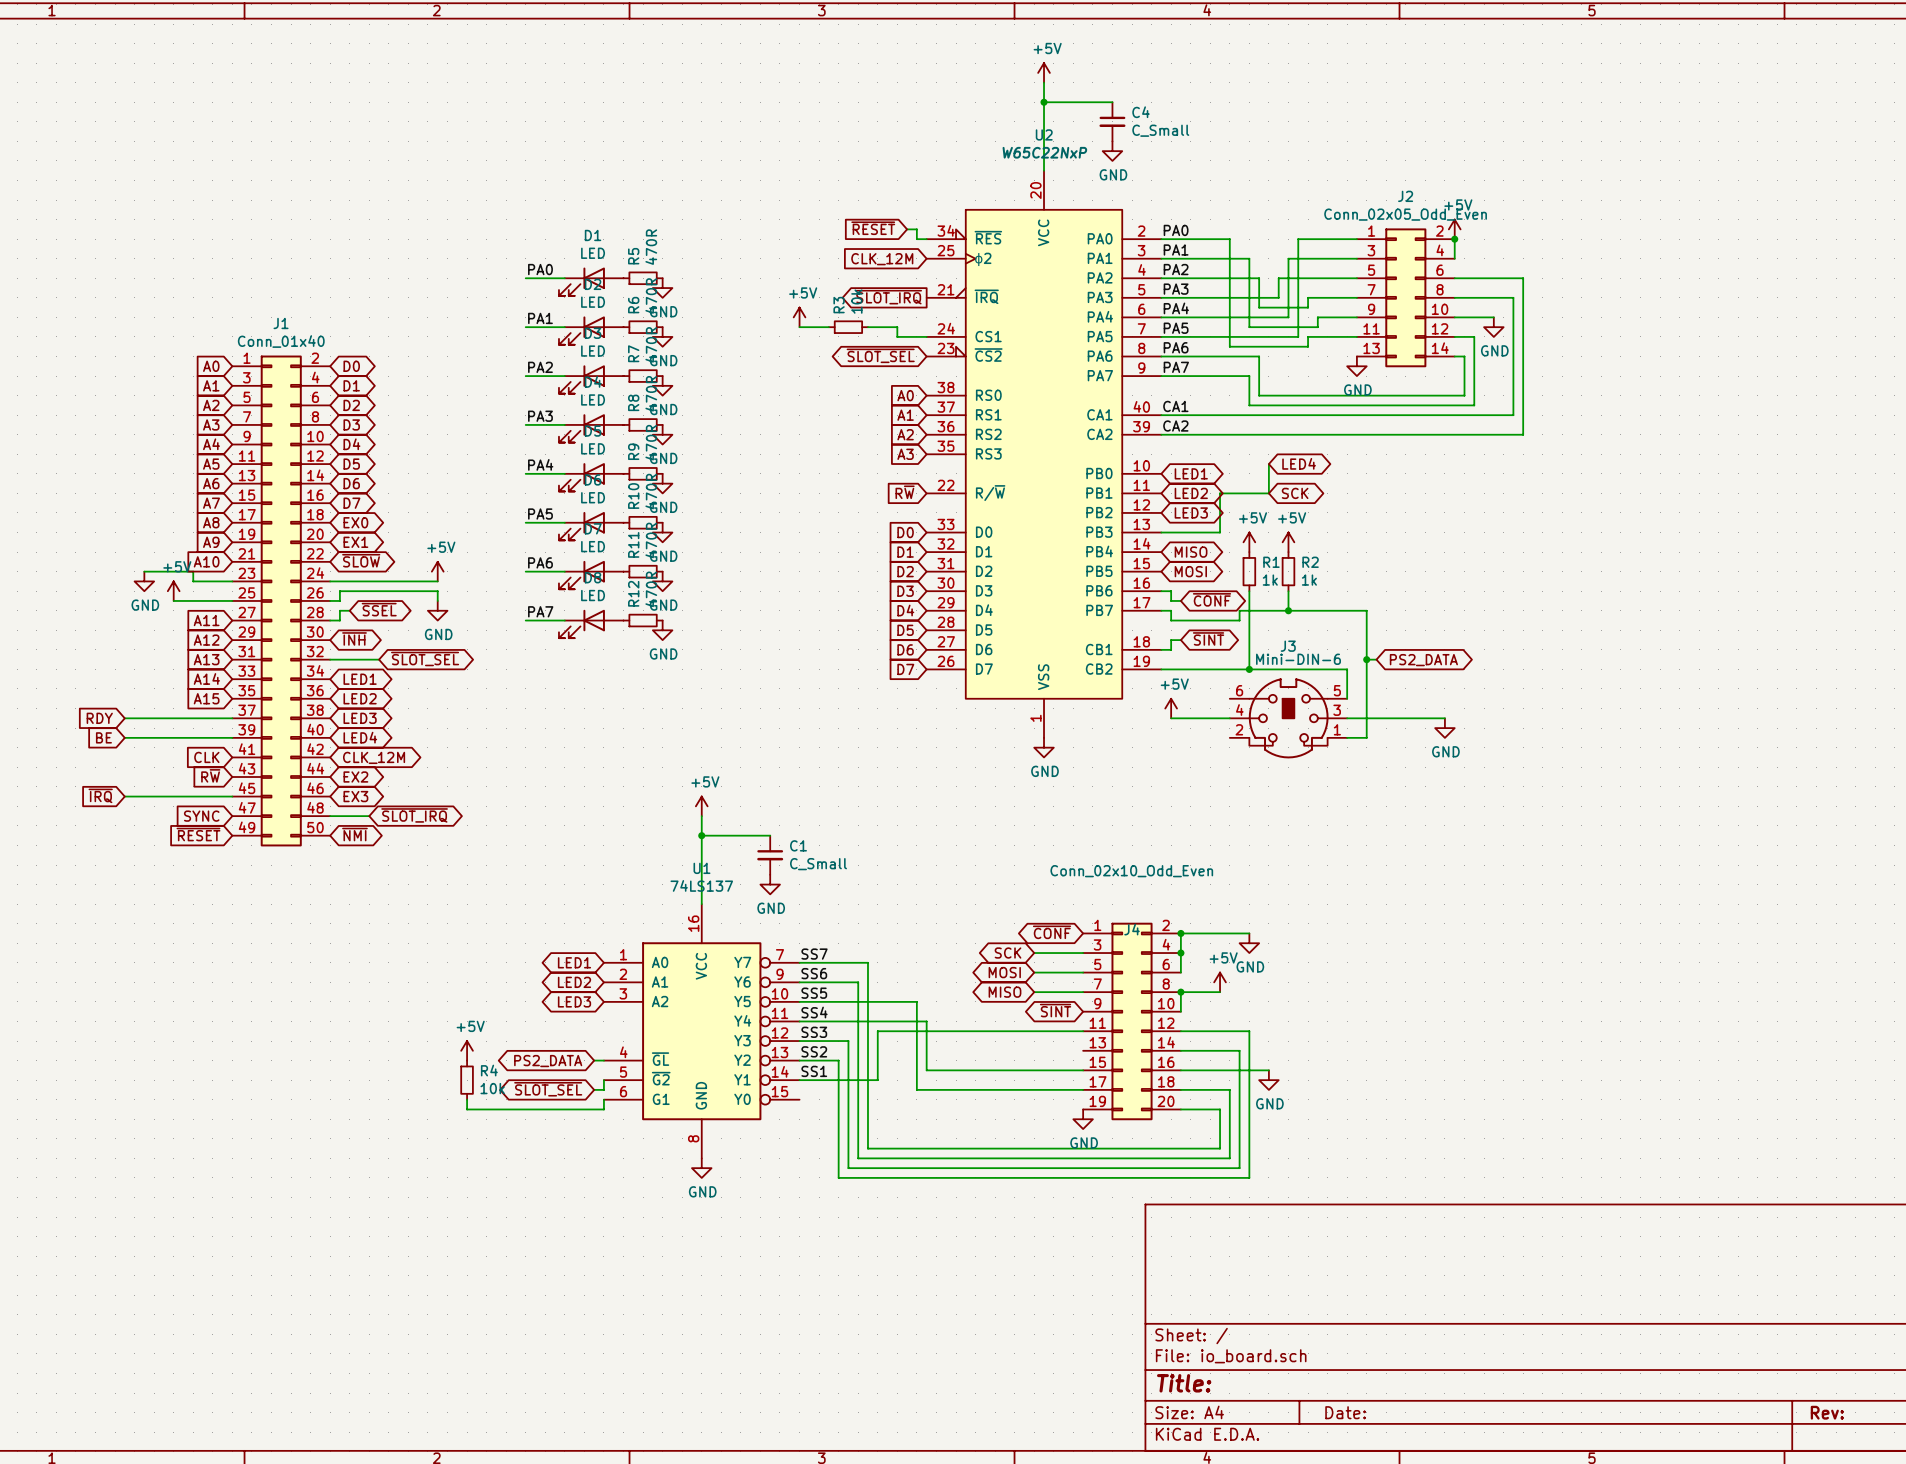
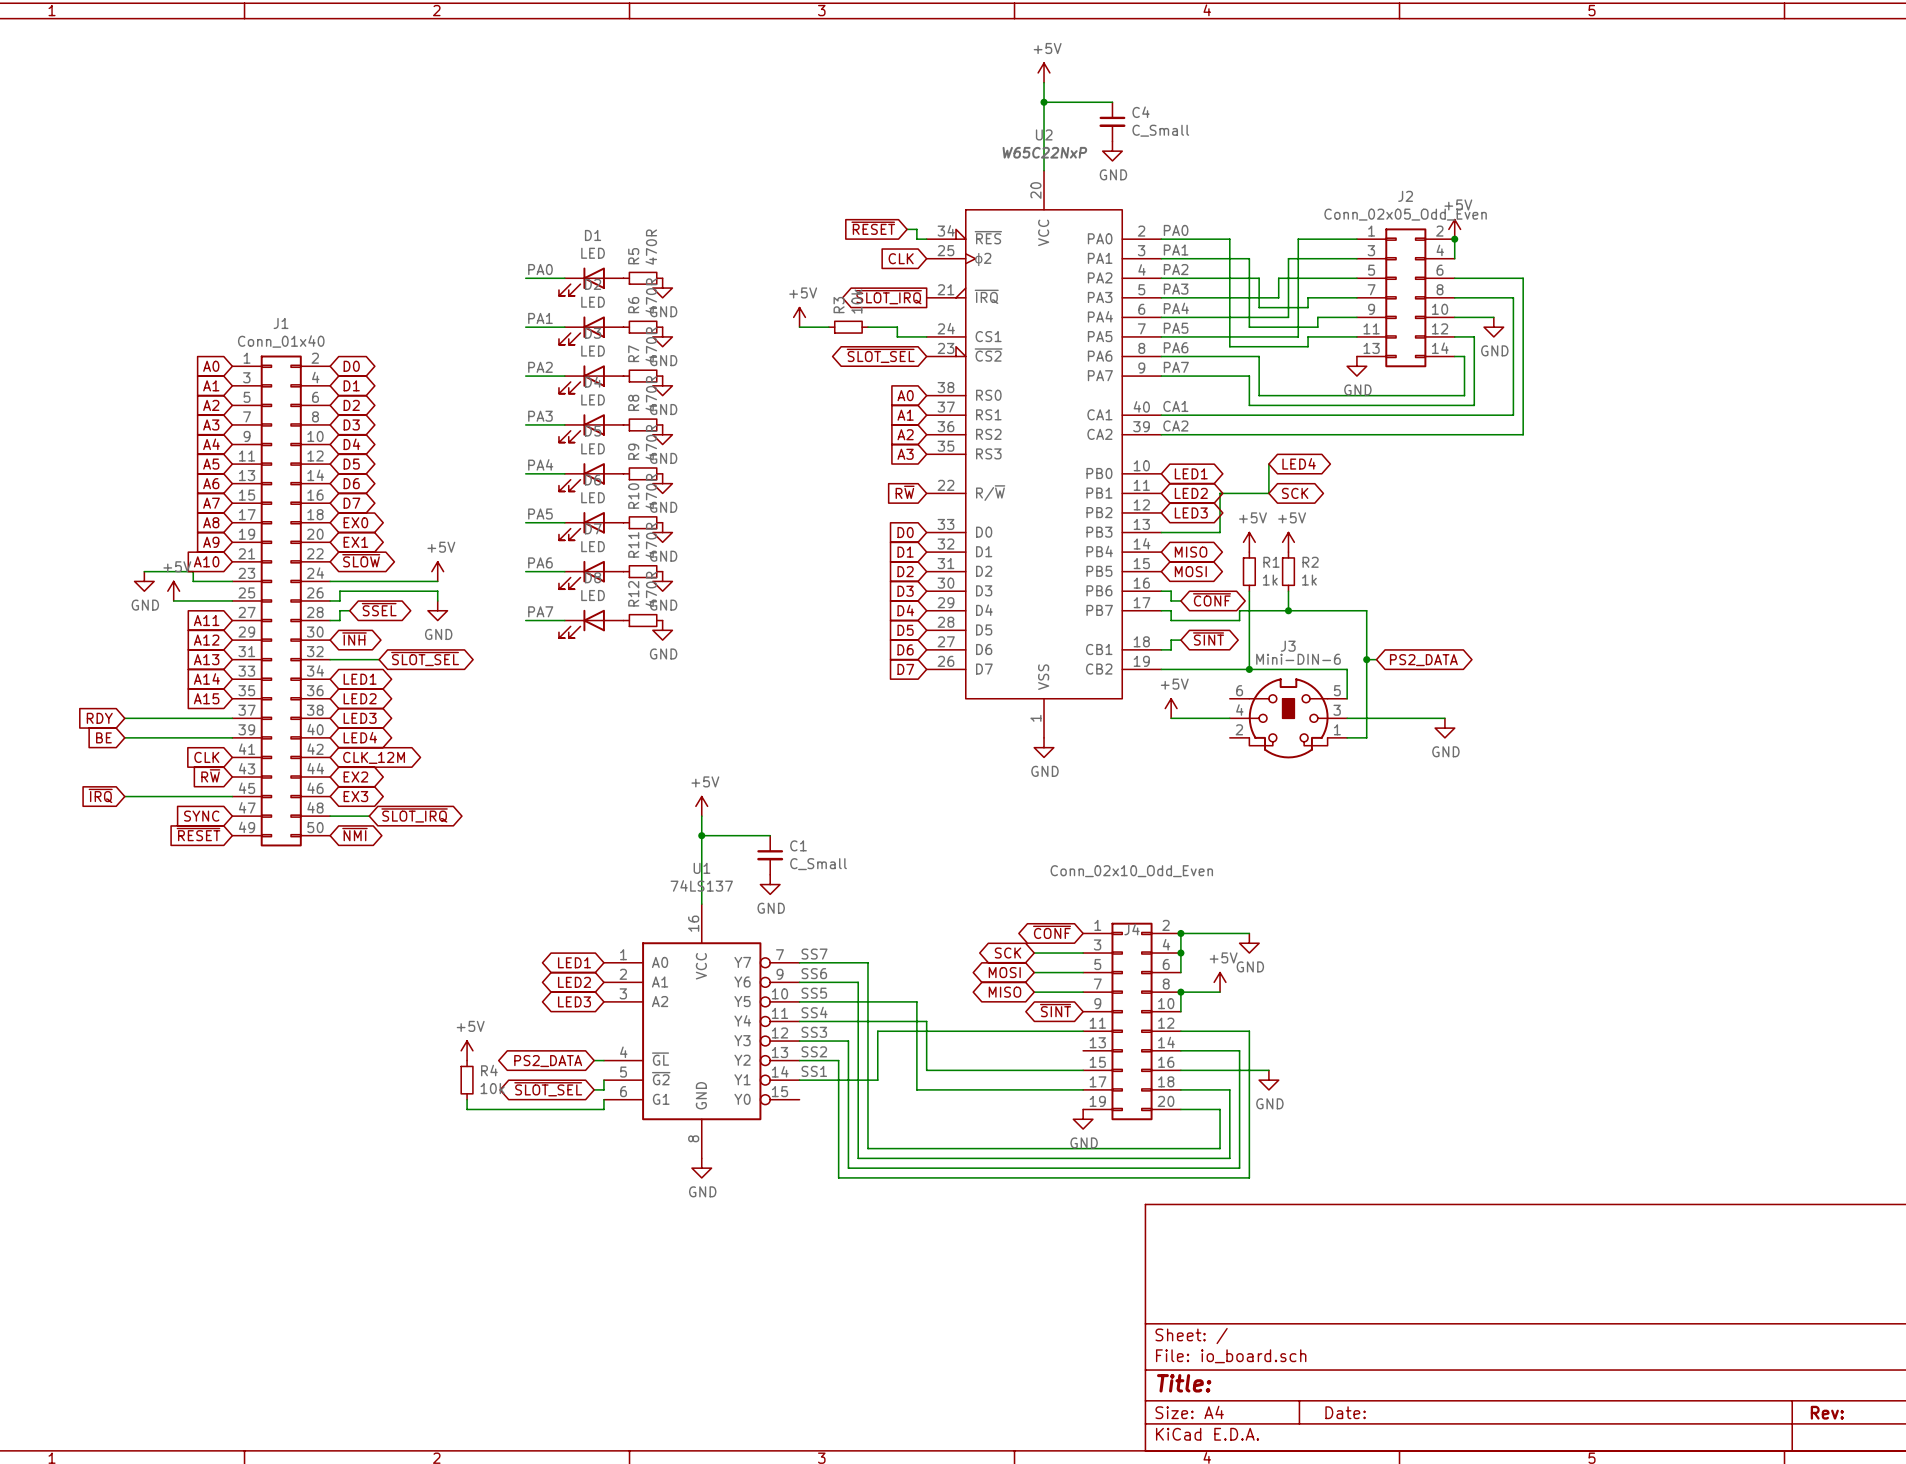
global label: CLK_12M (882, 259) -> CLK (901, 258)

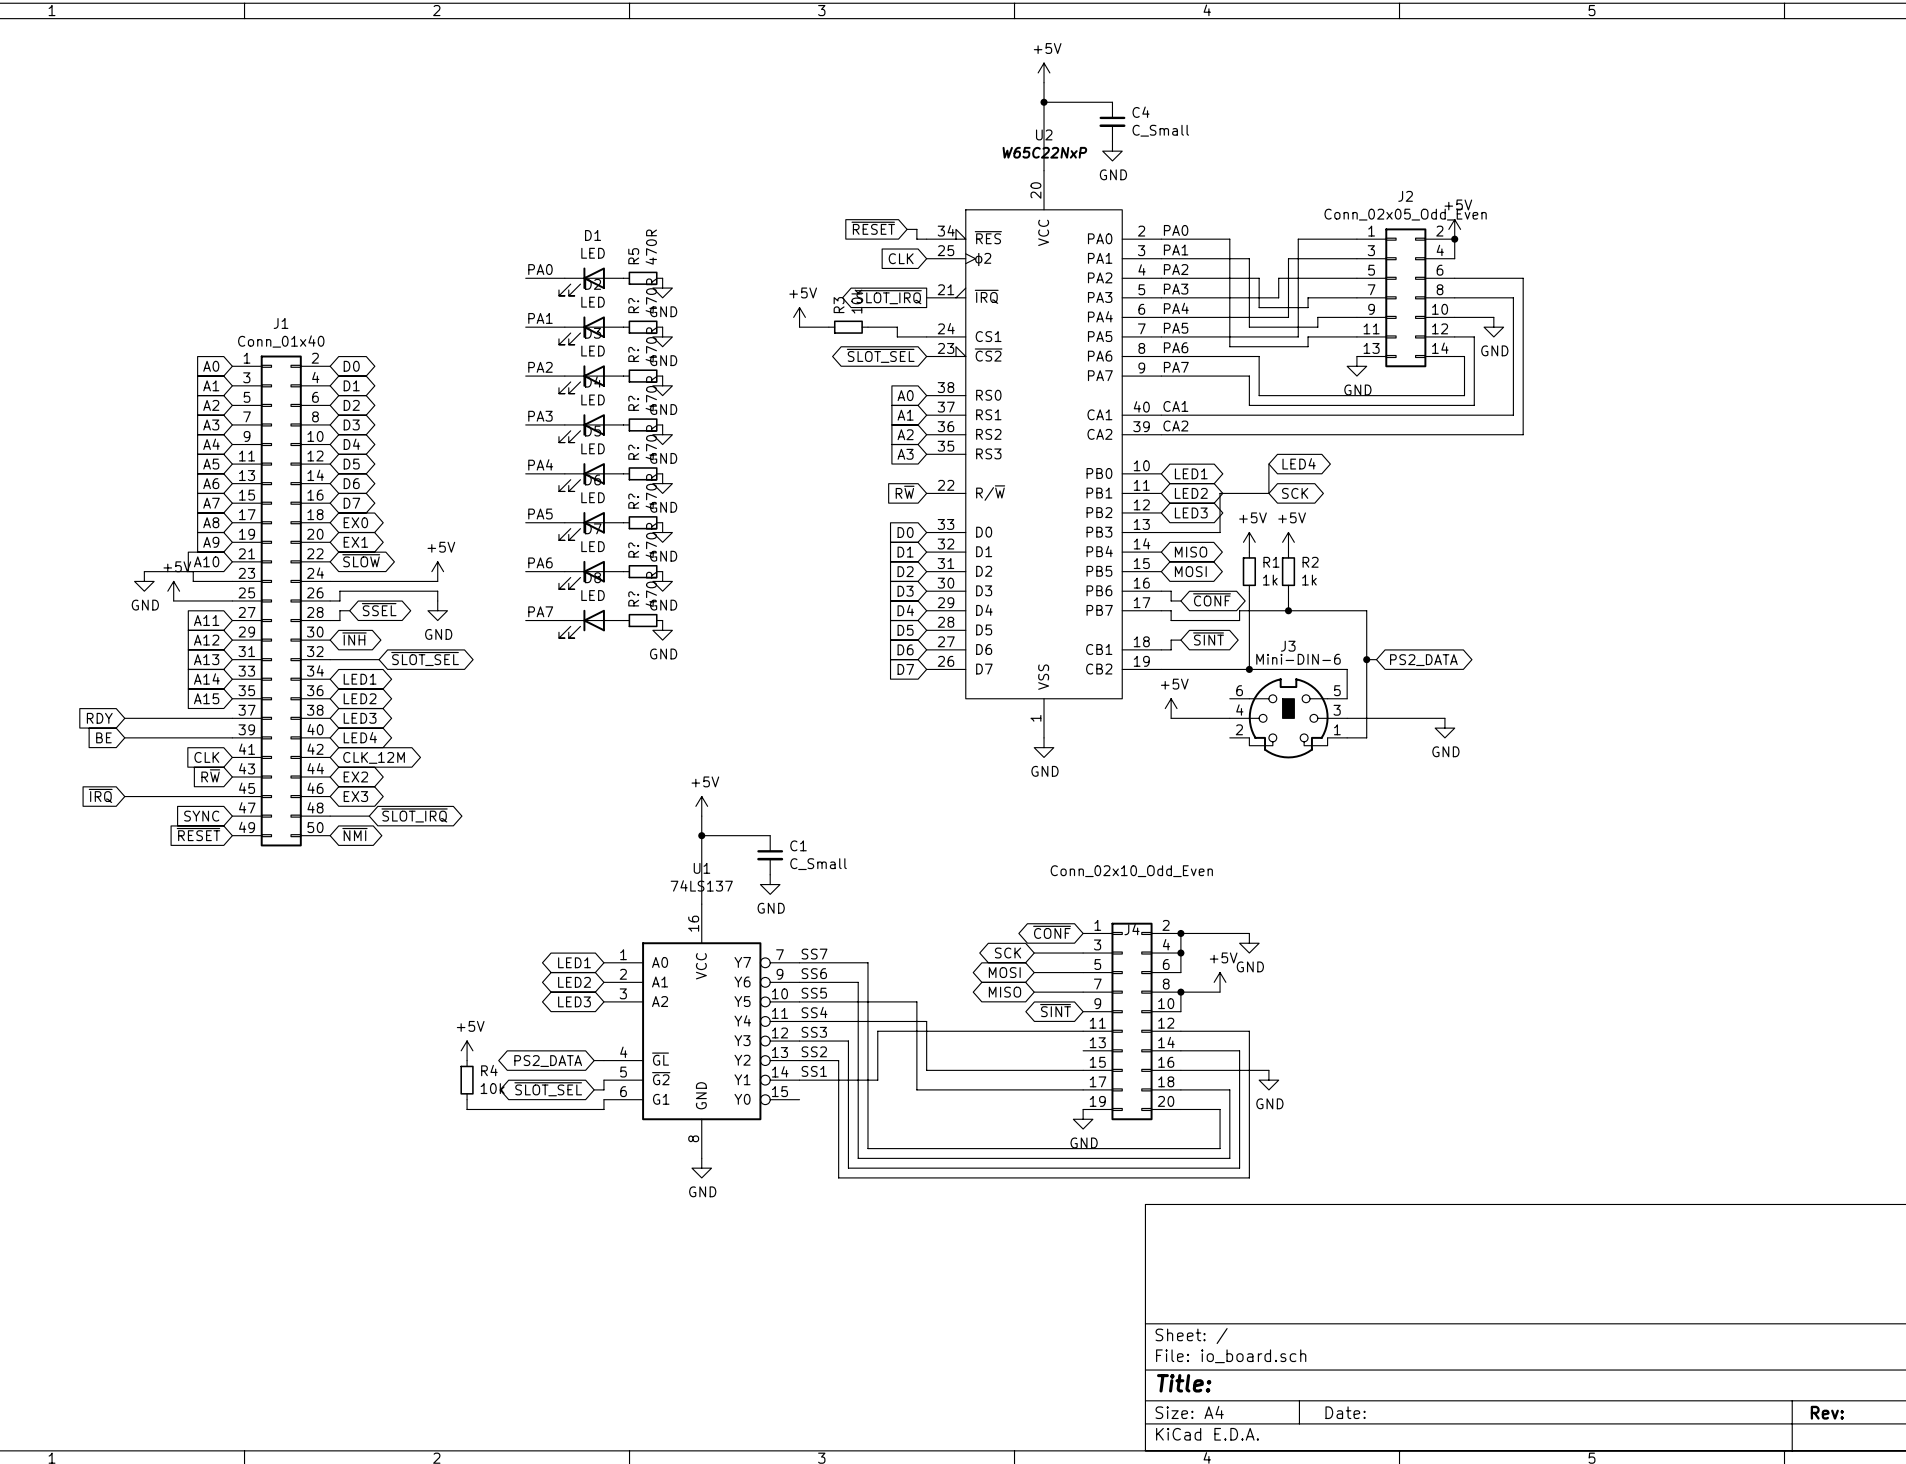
R6 name: R6 (633, 305) -> R? (633, 305)
R7 name: R7 (633, 353) -> R? (633, 354)
R8 name: R8 (633, 402) -> R? (633, 403)
R9 name: R9 (633, 451) -> R? (633, 452)
R10 name: R10 (633, 496) -> R? (633, 501)
R11 name: R11 (633, 544) -> R? (633, 550)
R12 name: R12 (633, 593) -> R? (633, 598)

